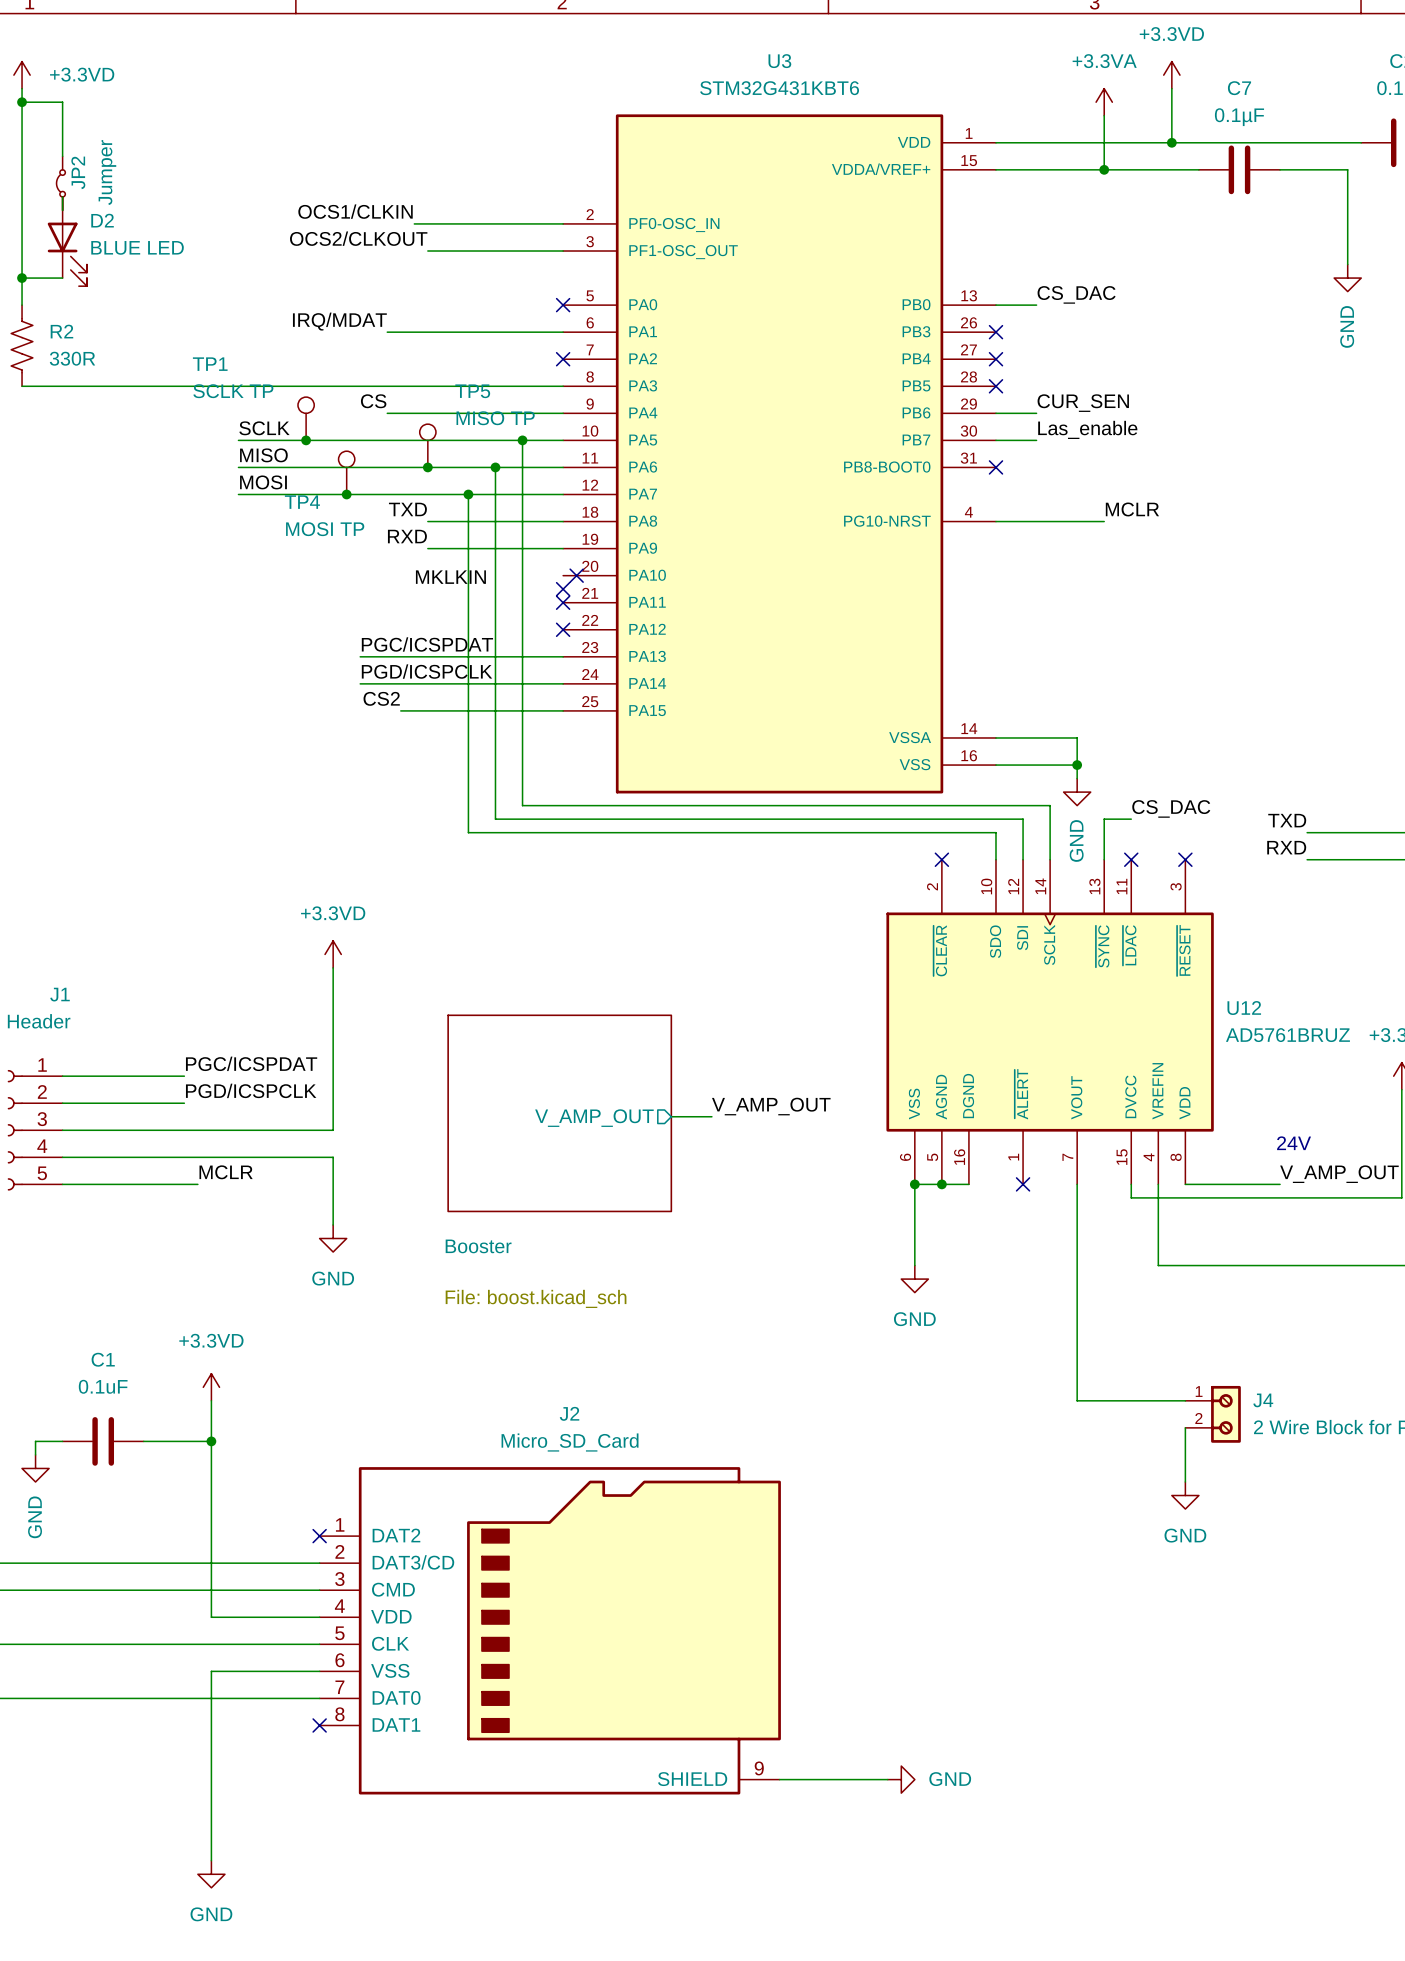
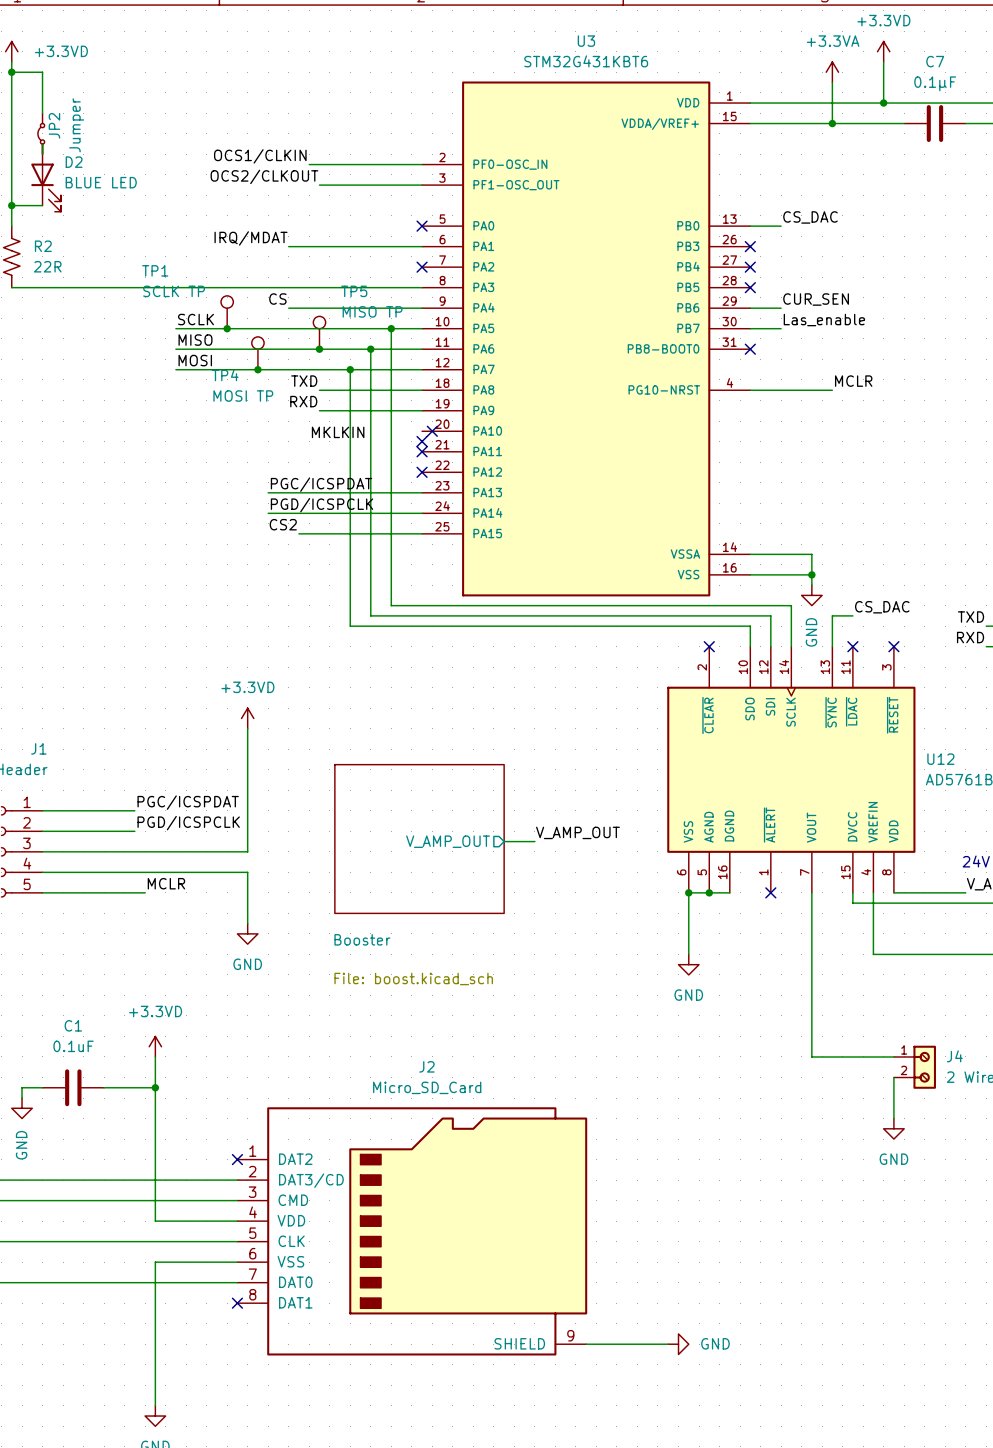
R2 value: 330R (72, 358) -> 22R (47, 266)

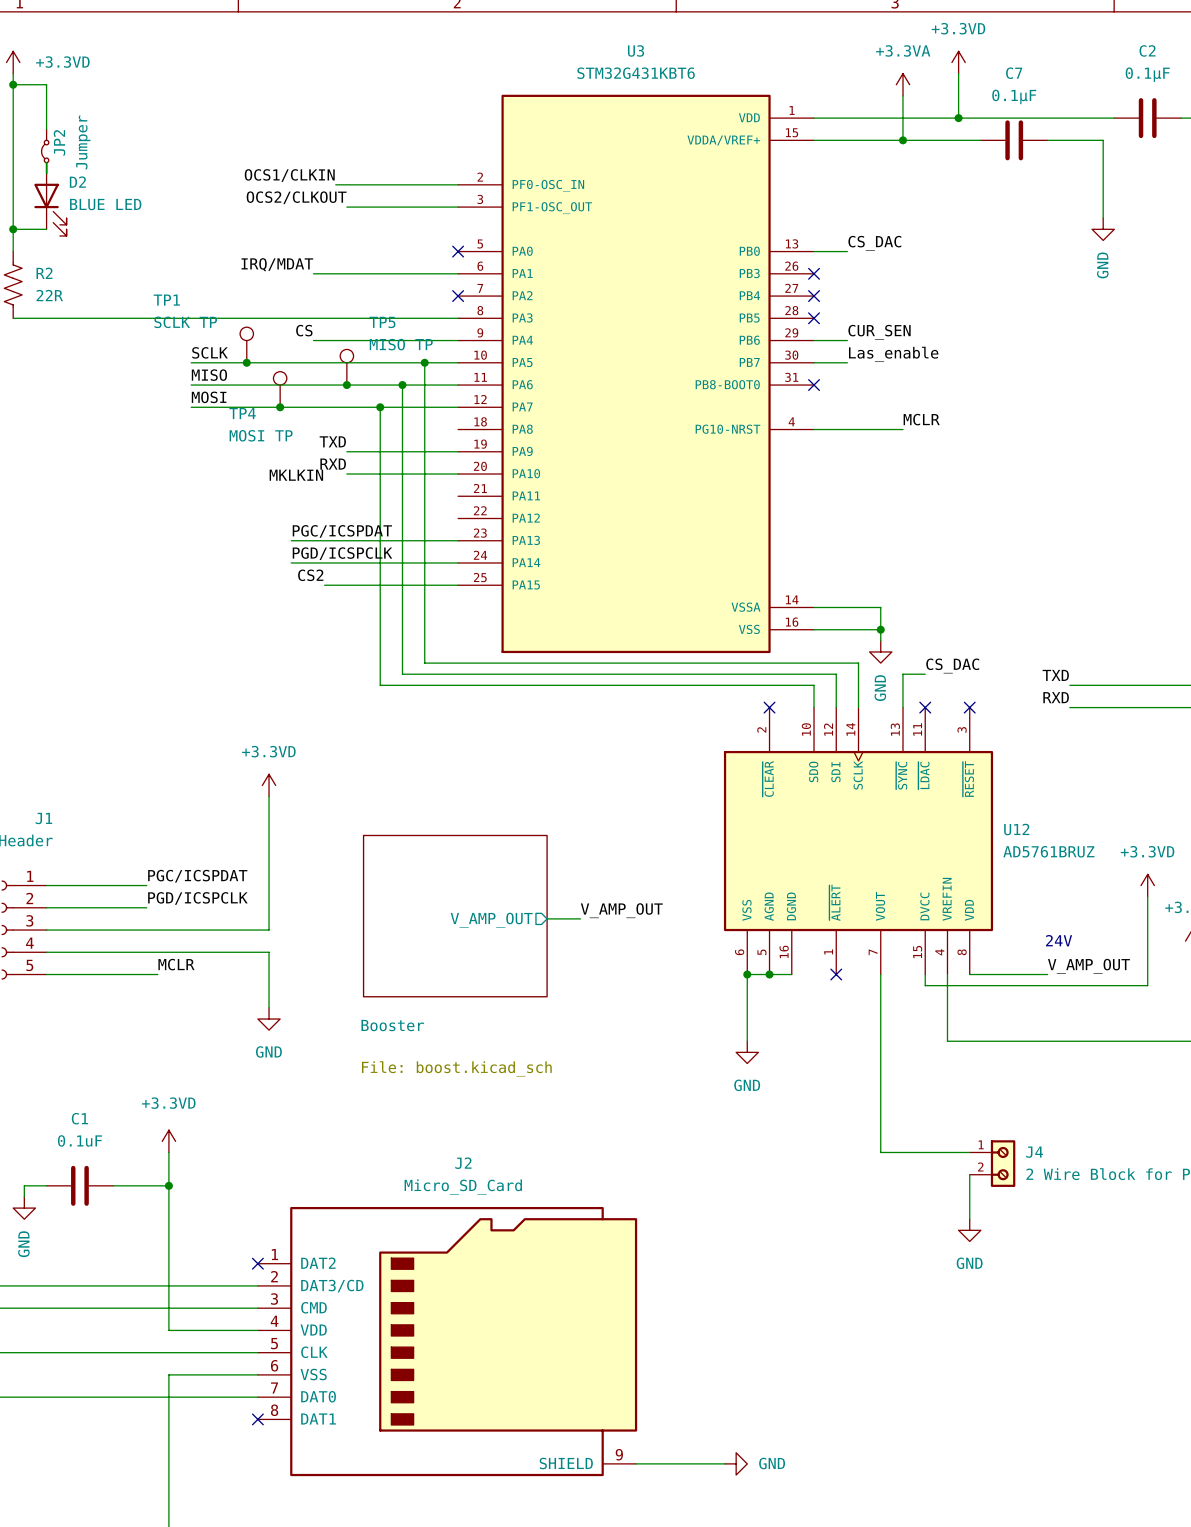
label: TXD (304, 381) -> none
wire: (319, 390) (422, 390) -> (346, 474) (458, 474)
label: RXD (303, 401) -> TXD (332, 441)
label: none -> RXD (333, 464)
no-connect mark: (432, 431) -> none
label position: MKLKIN (338, 432) -> MKLKIN (296, 475)
no-connect mark: (422, 441) -> none
no-connect mark: (422, 451) -> none
no-connect mark: (422, 472) -> none

